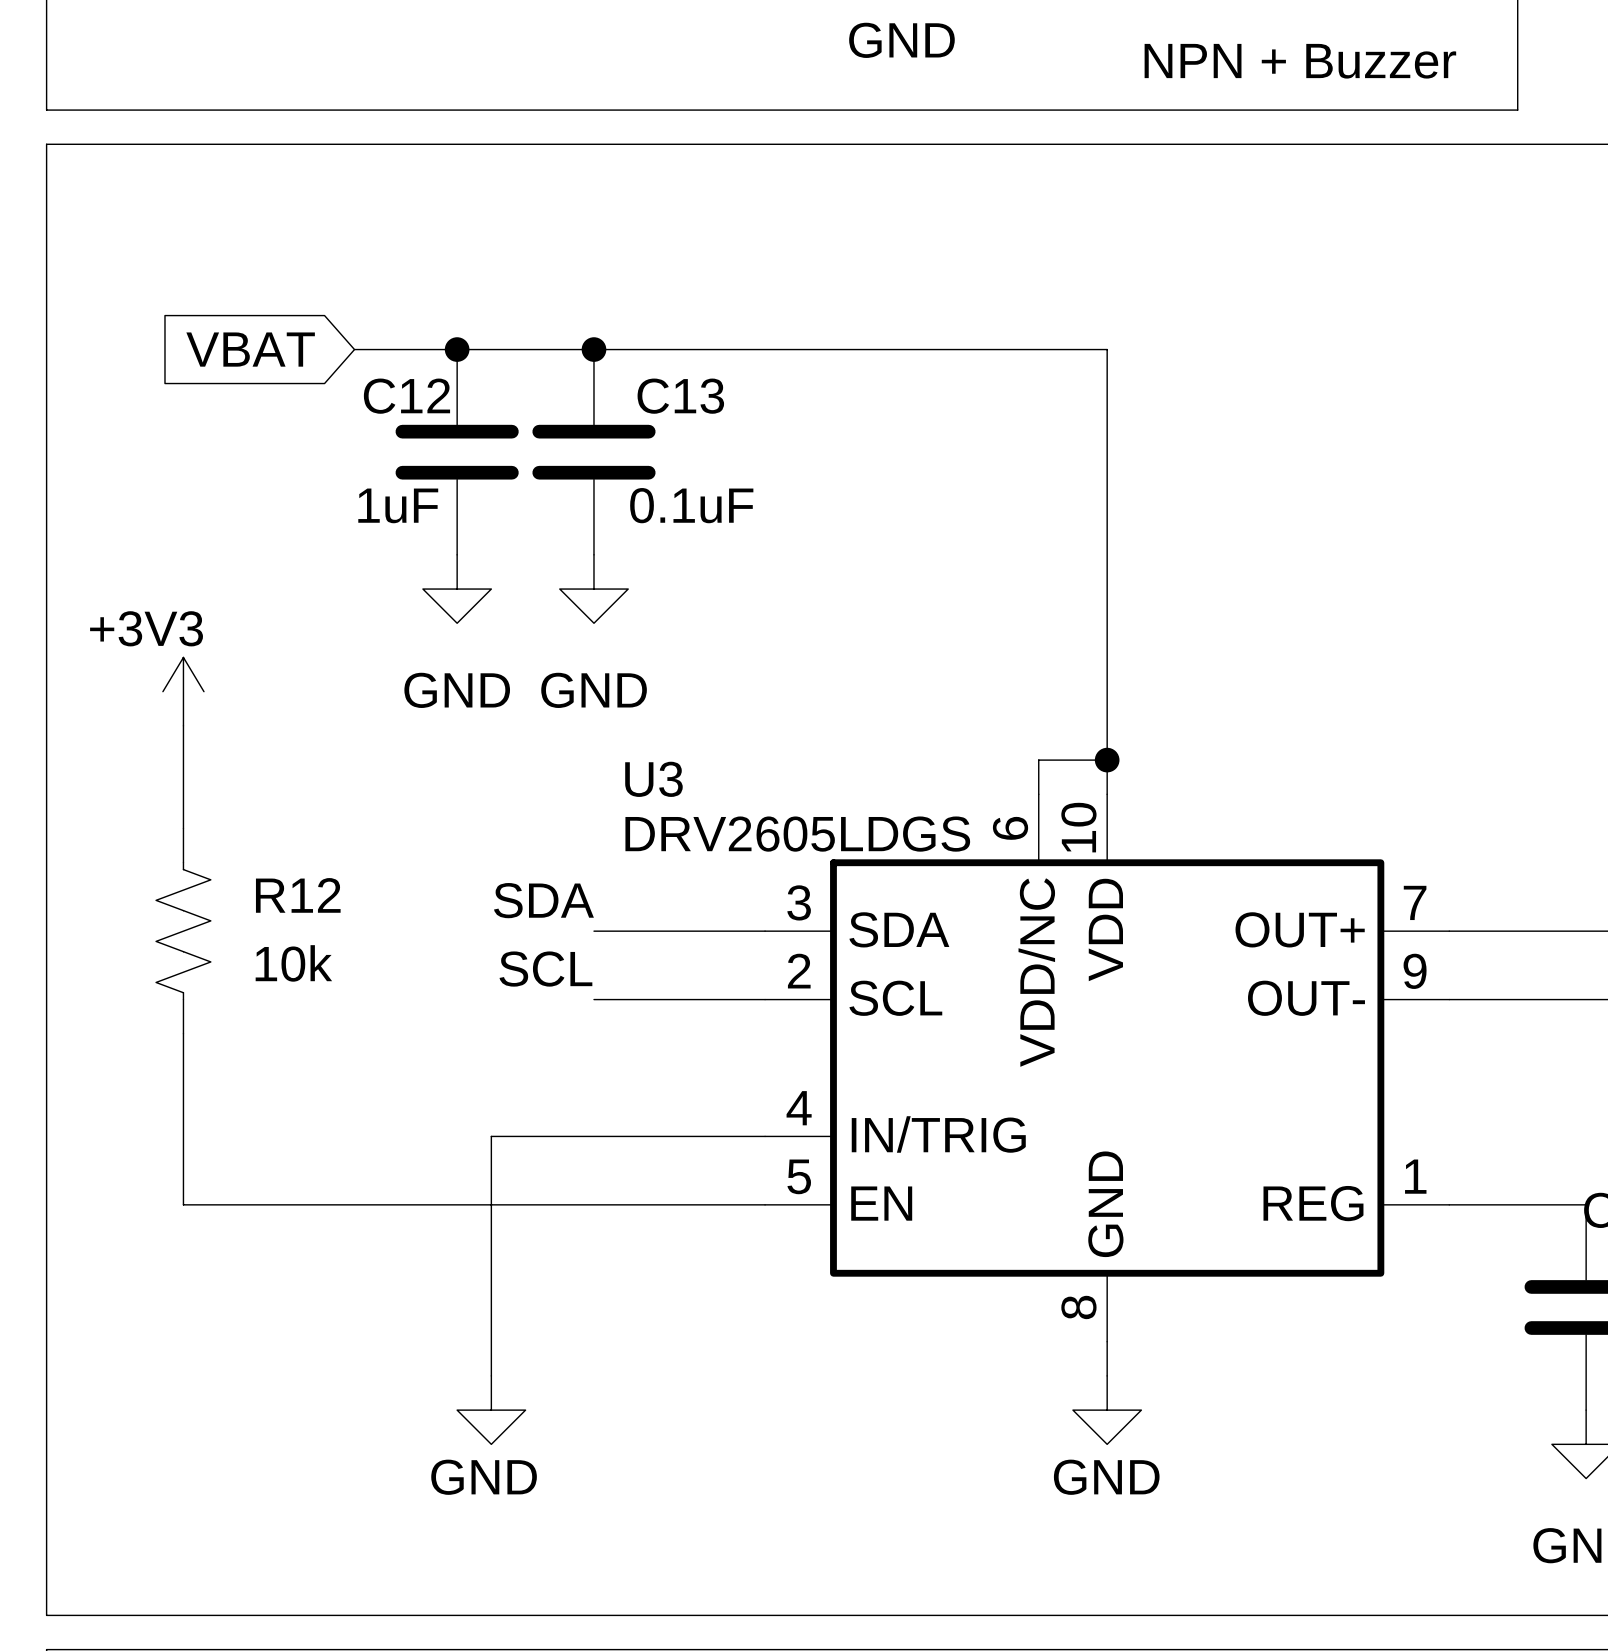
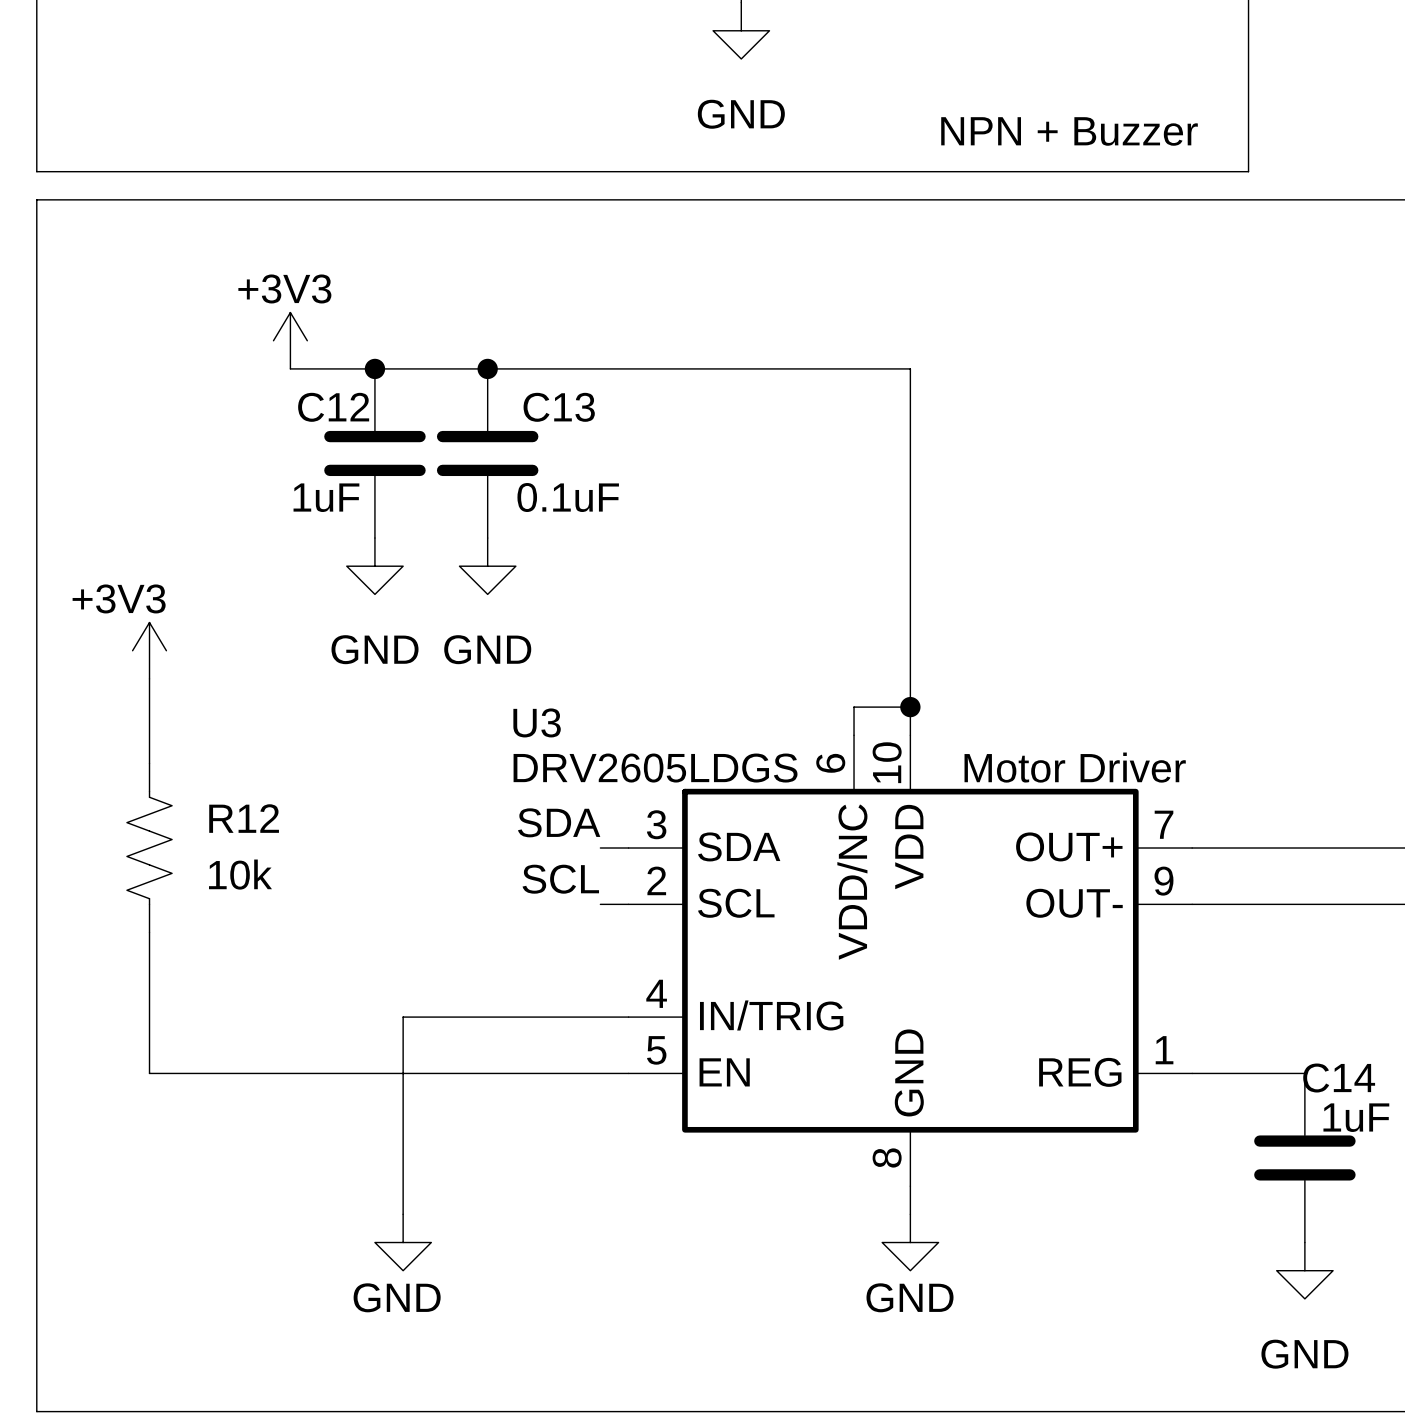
power symbol: none -> +3V3 (290, 340)
global label: VBAT (250, 349) -> none
text: none -> Motor Driver (1075, 767)
label position: SDA (543, 900) -> SDA (559, 822)
wire: (593, 931) (730, 931) -> none
label position: SCL (545, 969) -> SCL (560, 879)
wire: (593, 999) (730, 999) -> none

